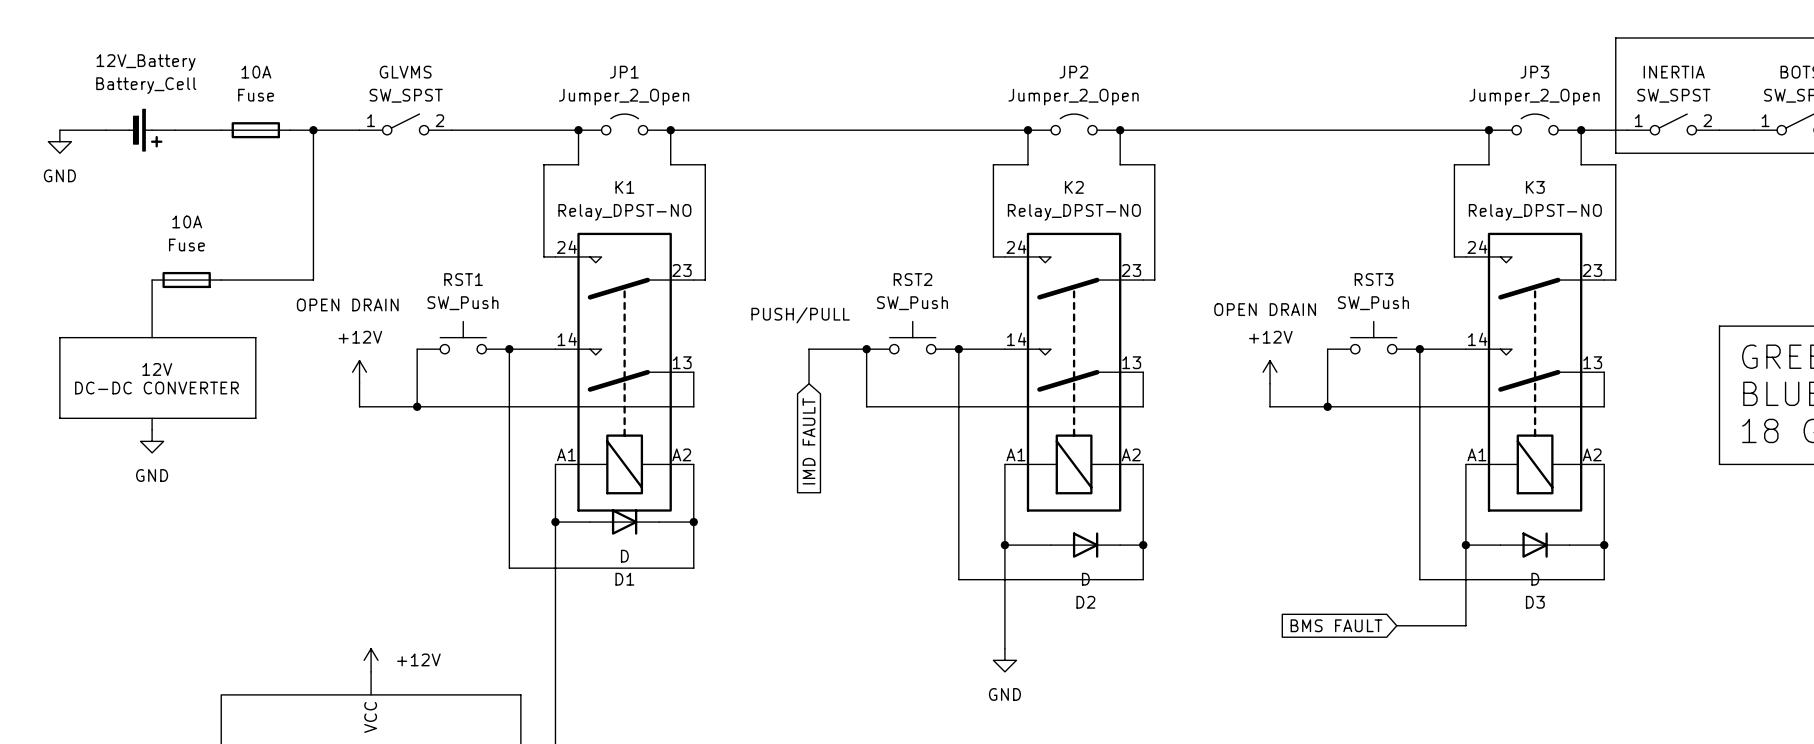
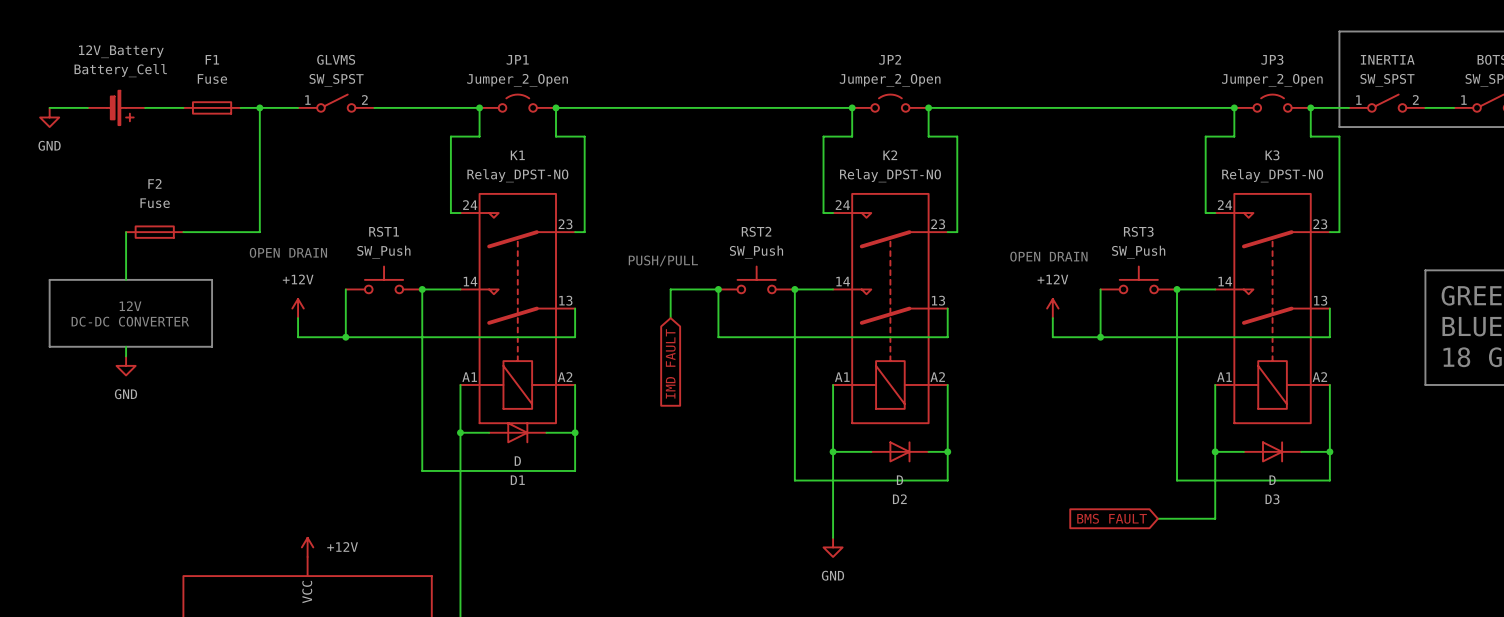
10A name: 10A (256, 72) -> F1 (212, 59)
10A name: 10A (187, 221) -> F2 (154, 183)

